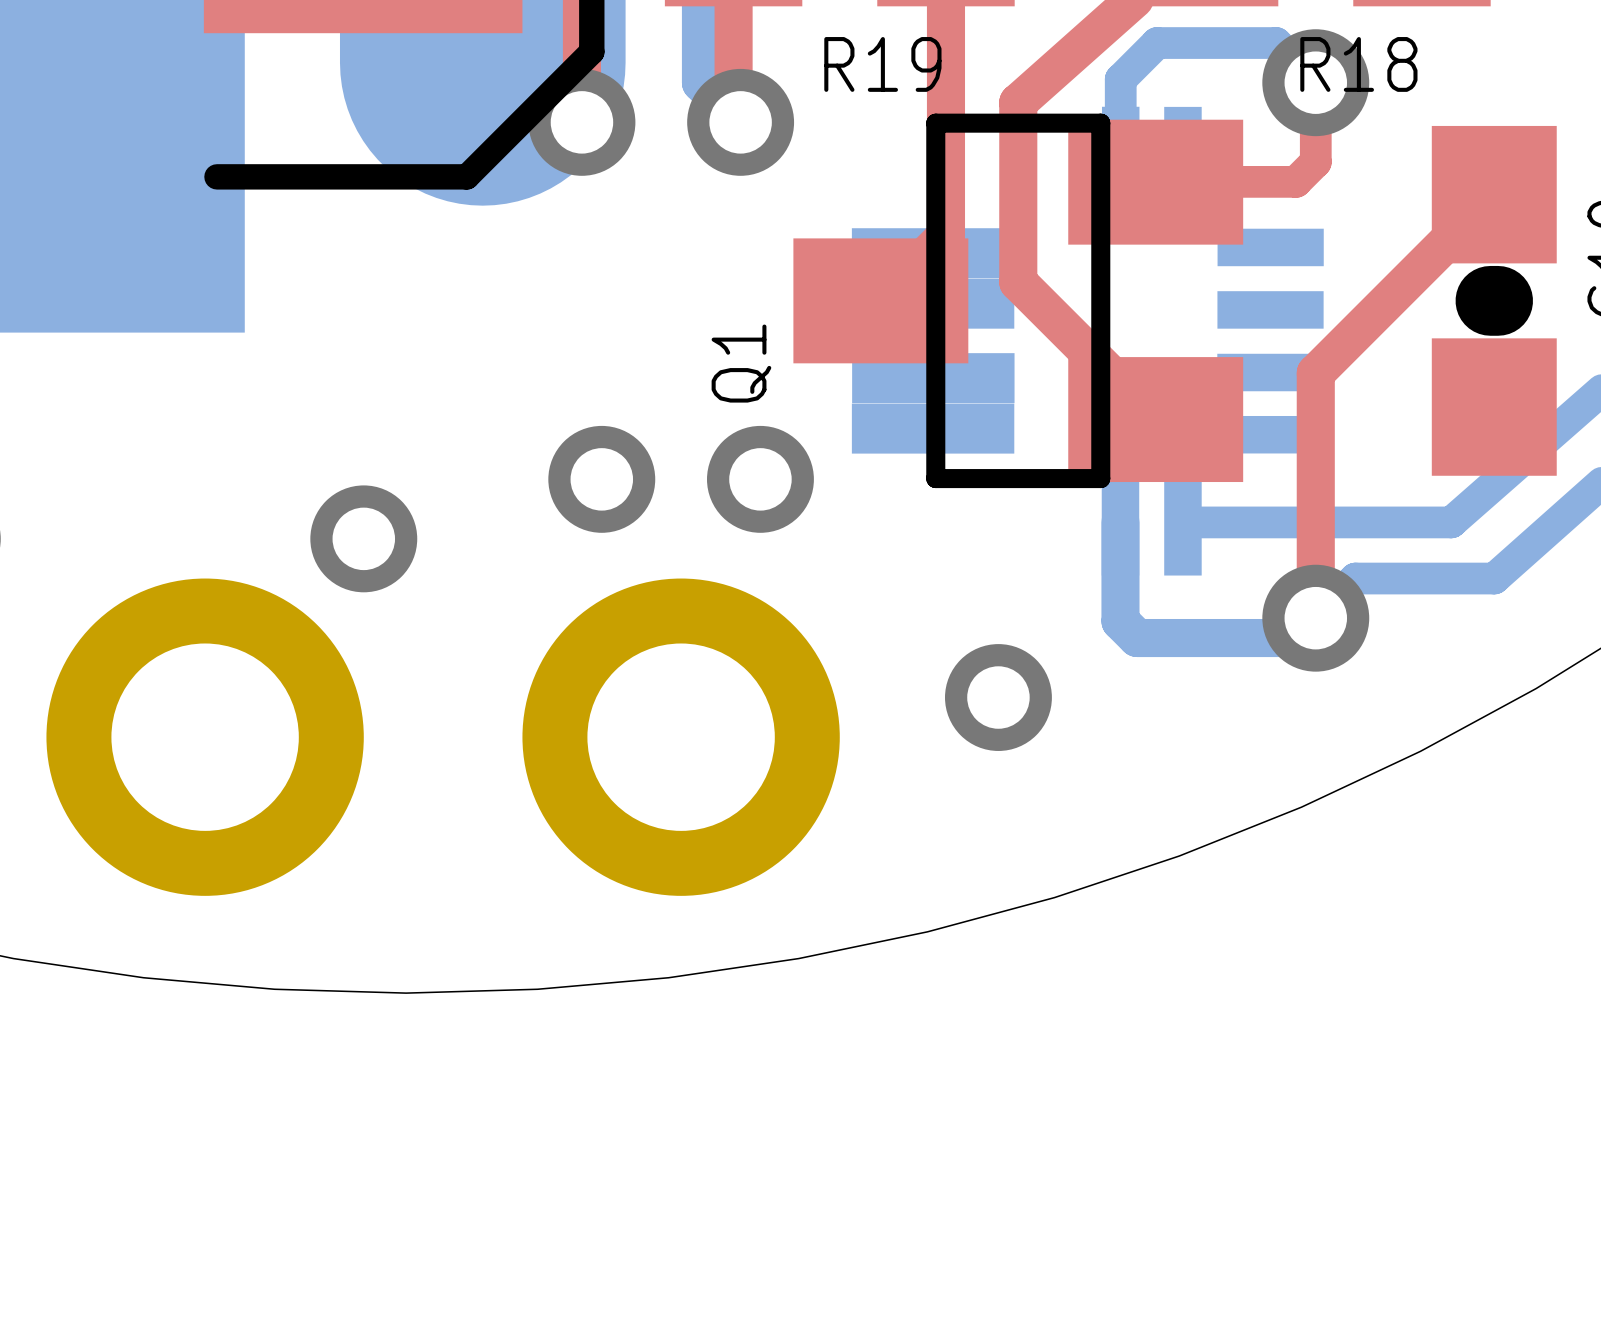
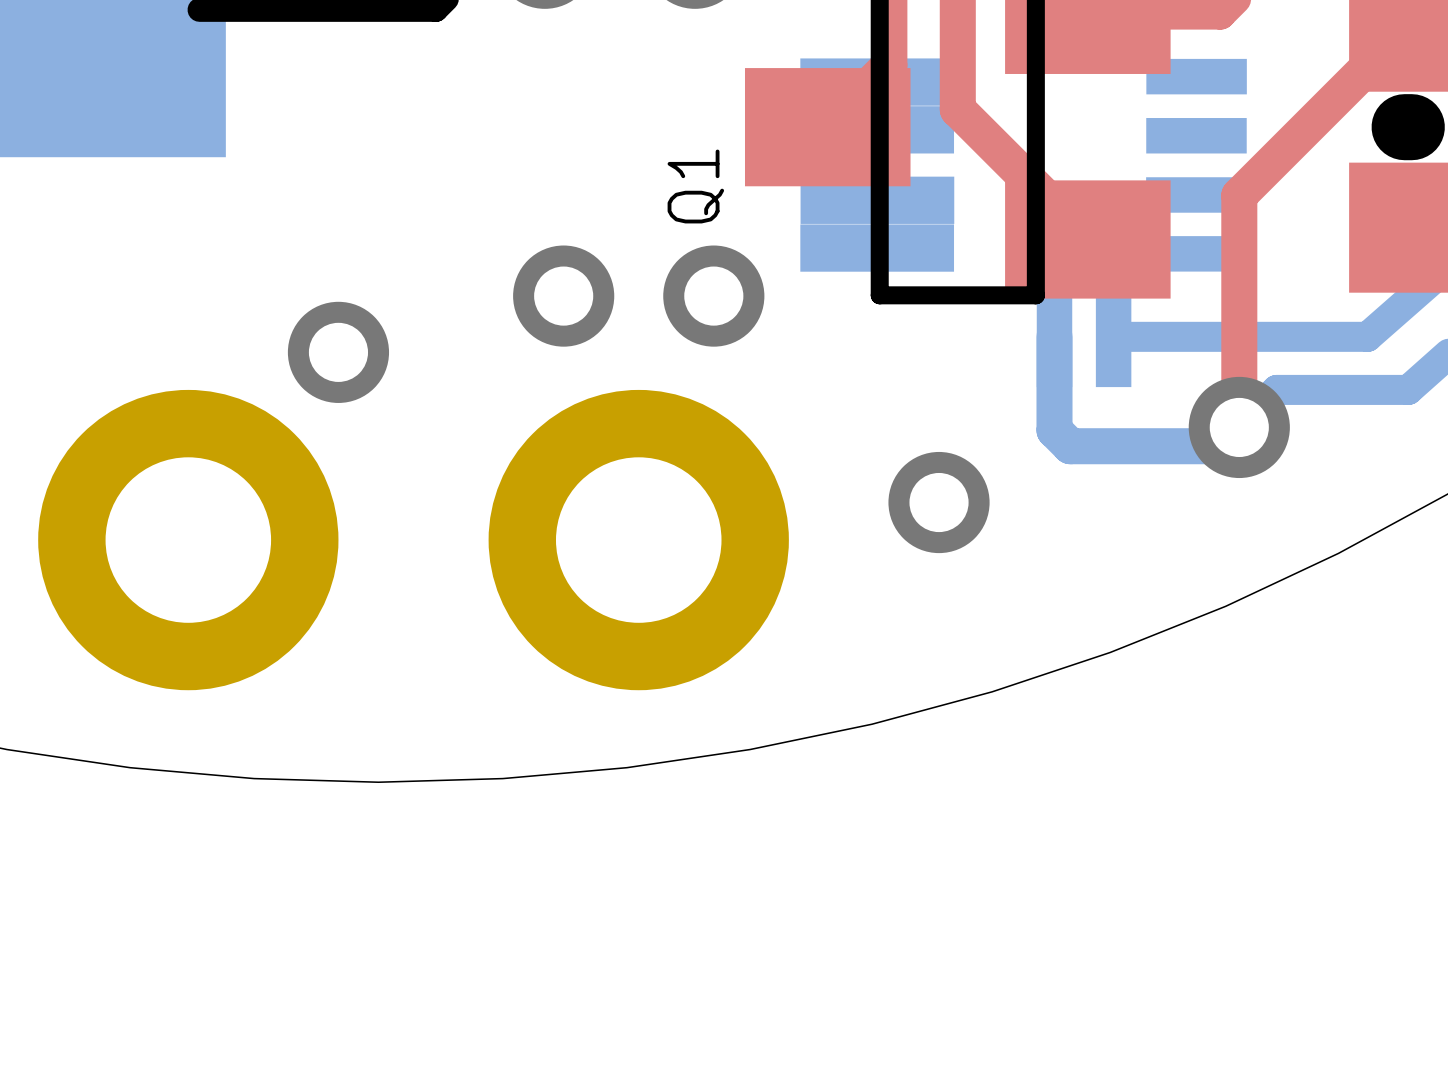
part footprint: [46, 578, 364, 896] -> [38, 389, 339, 691]
part footprint: [522, 578, 840, 896] -> [488, 389, 789, 691]

